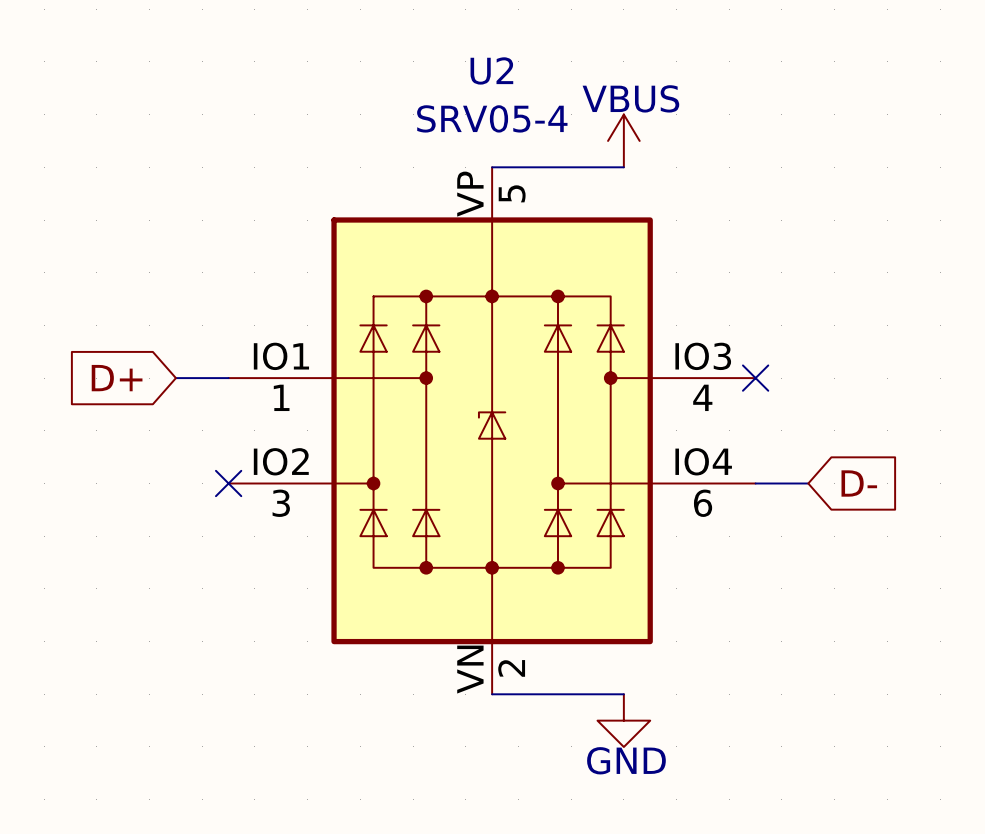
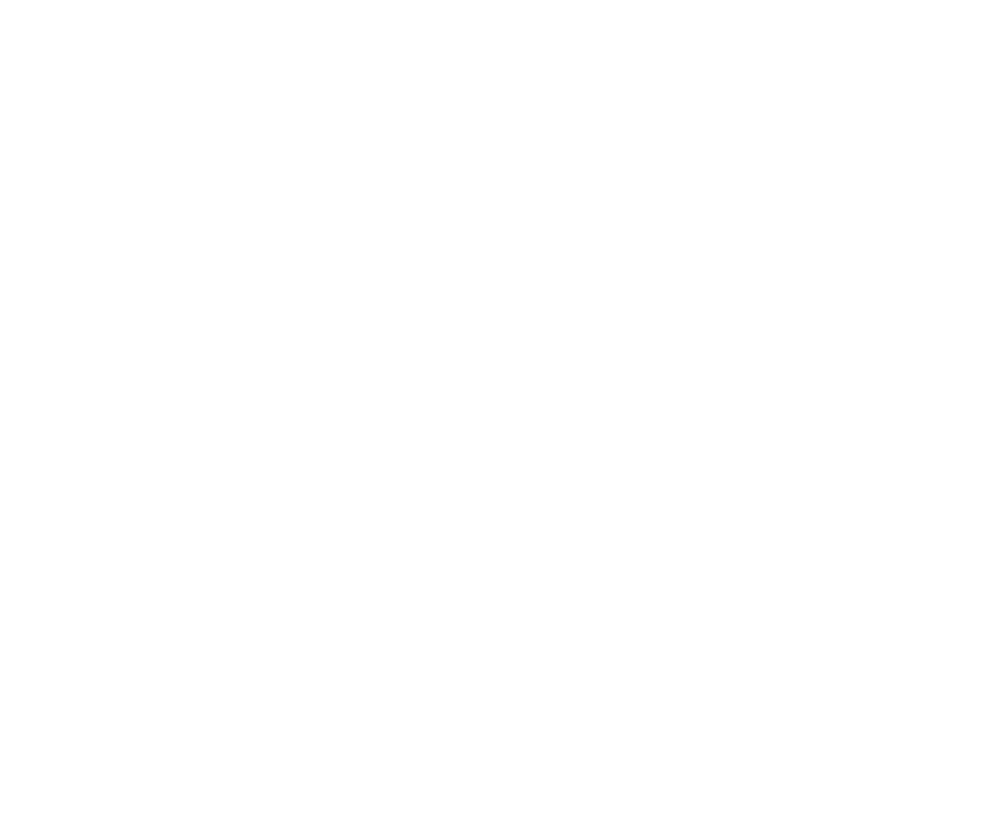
power symbol: VBUS (623, 140) -> none
wire: (492, 167) (623, 167) -> none
global label: D+ (117, 378) -> none
wire: (175, 378) (228, 378) -> none
no-connect mark: (755, 378) -> none
U2: SRV05-4 (492, 430) -> none
no-connect mark: (228, 483) -> none
wire: (755, 483) (808, 483) -> none
global label: D- (859, 483) -> none
wire: (492, 694) (623, 694) -> none
power symbol: GND (623, 720) -> none

